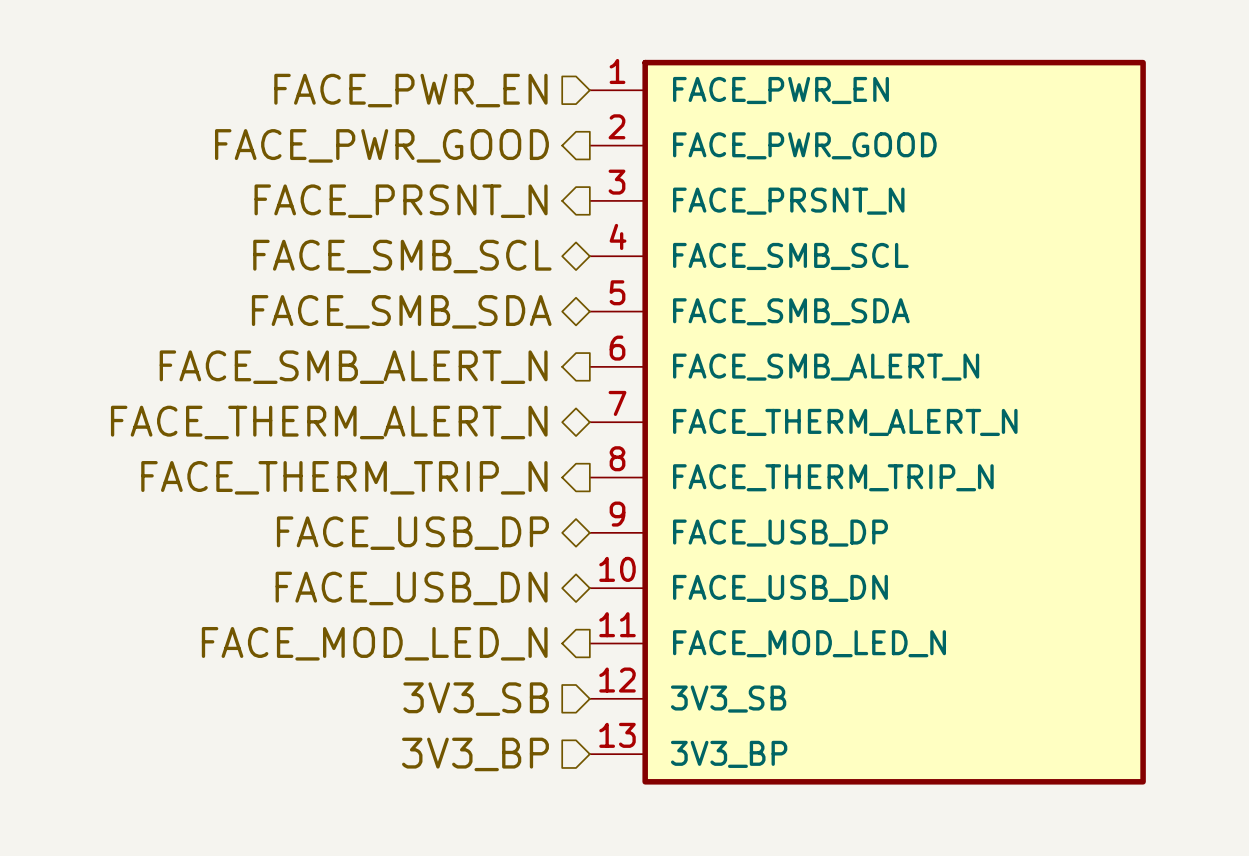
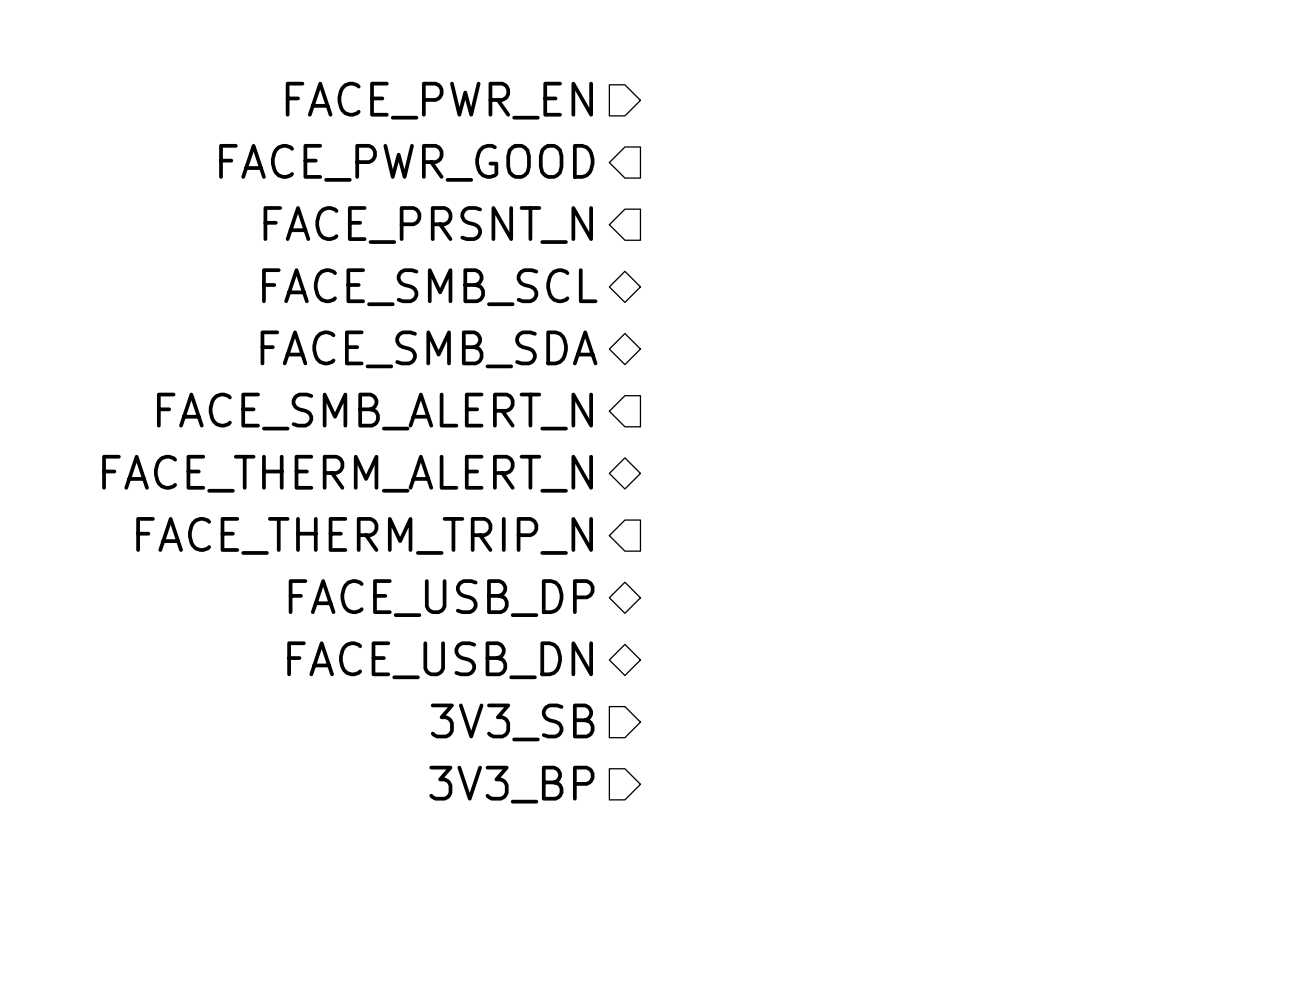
power symbol: (867, 422) -> none
hierarchical label shape: output (374, 643) -> input (512, 722)
hierarchical label: FACE_MOD_LED_N (374, 643) -> 3V3_SB (512, 722)
hierarchical label: 3V3_SB (476, 699) -> 3V3_BP (511, 784)
hierarchical label: 3V3_BP (475, 754) -> none

